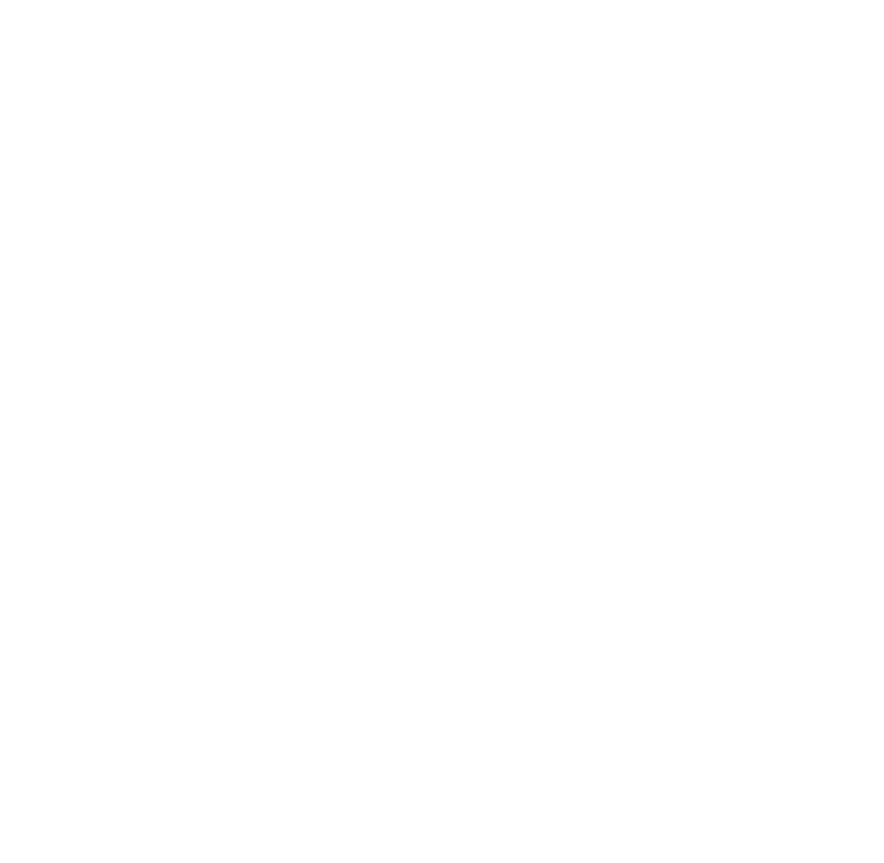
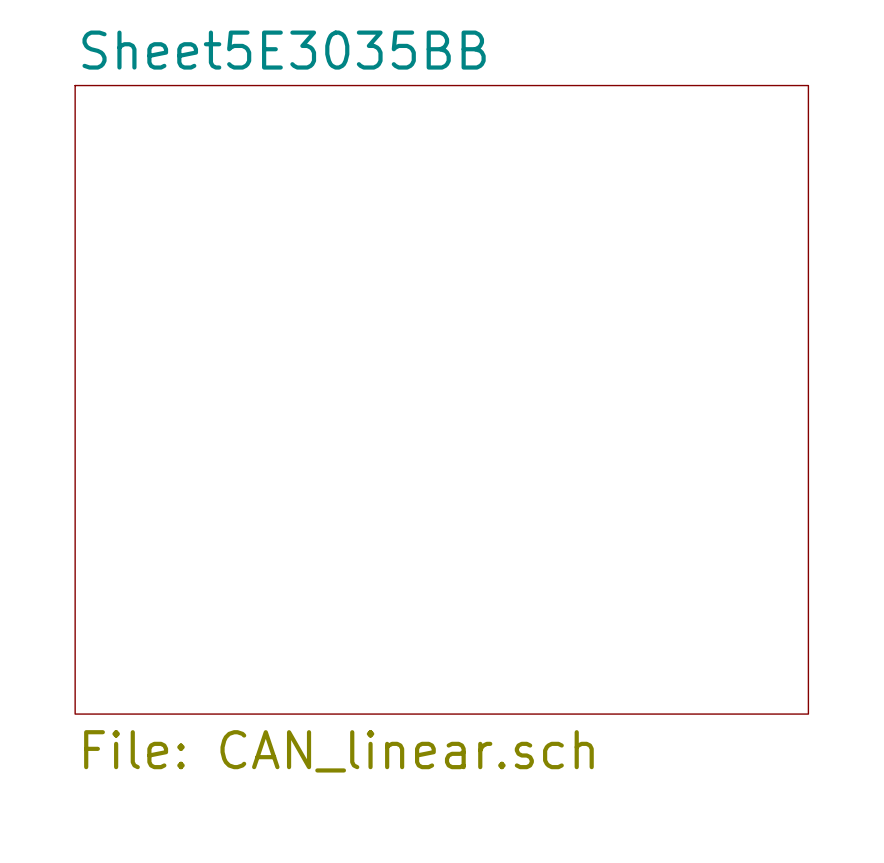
sheet Sheet5E3035BB: none -> File: CAN_linear.sch (441, 399)

